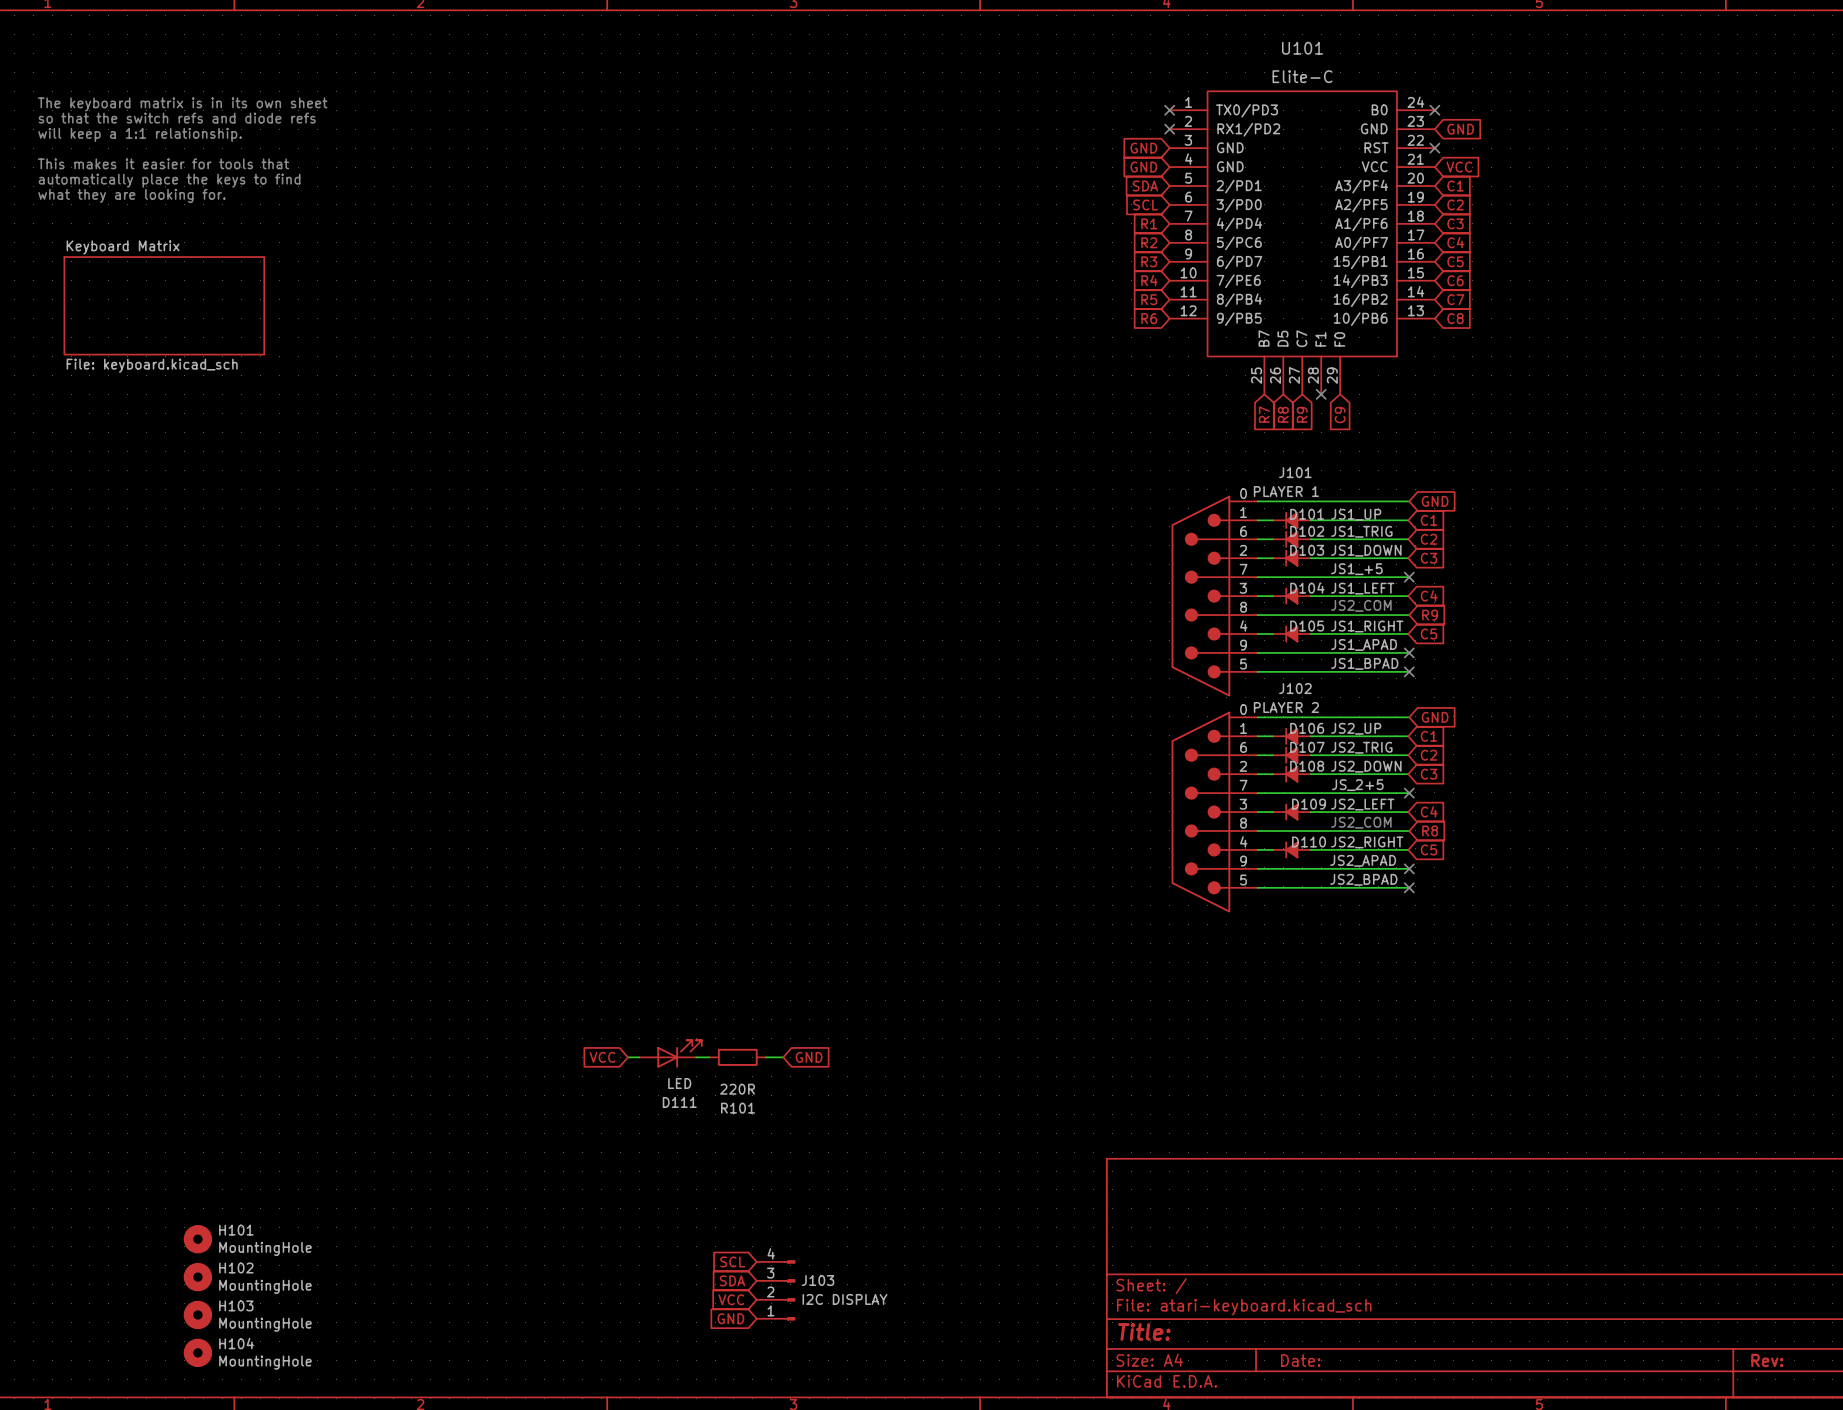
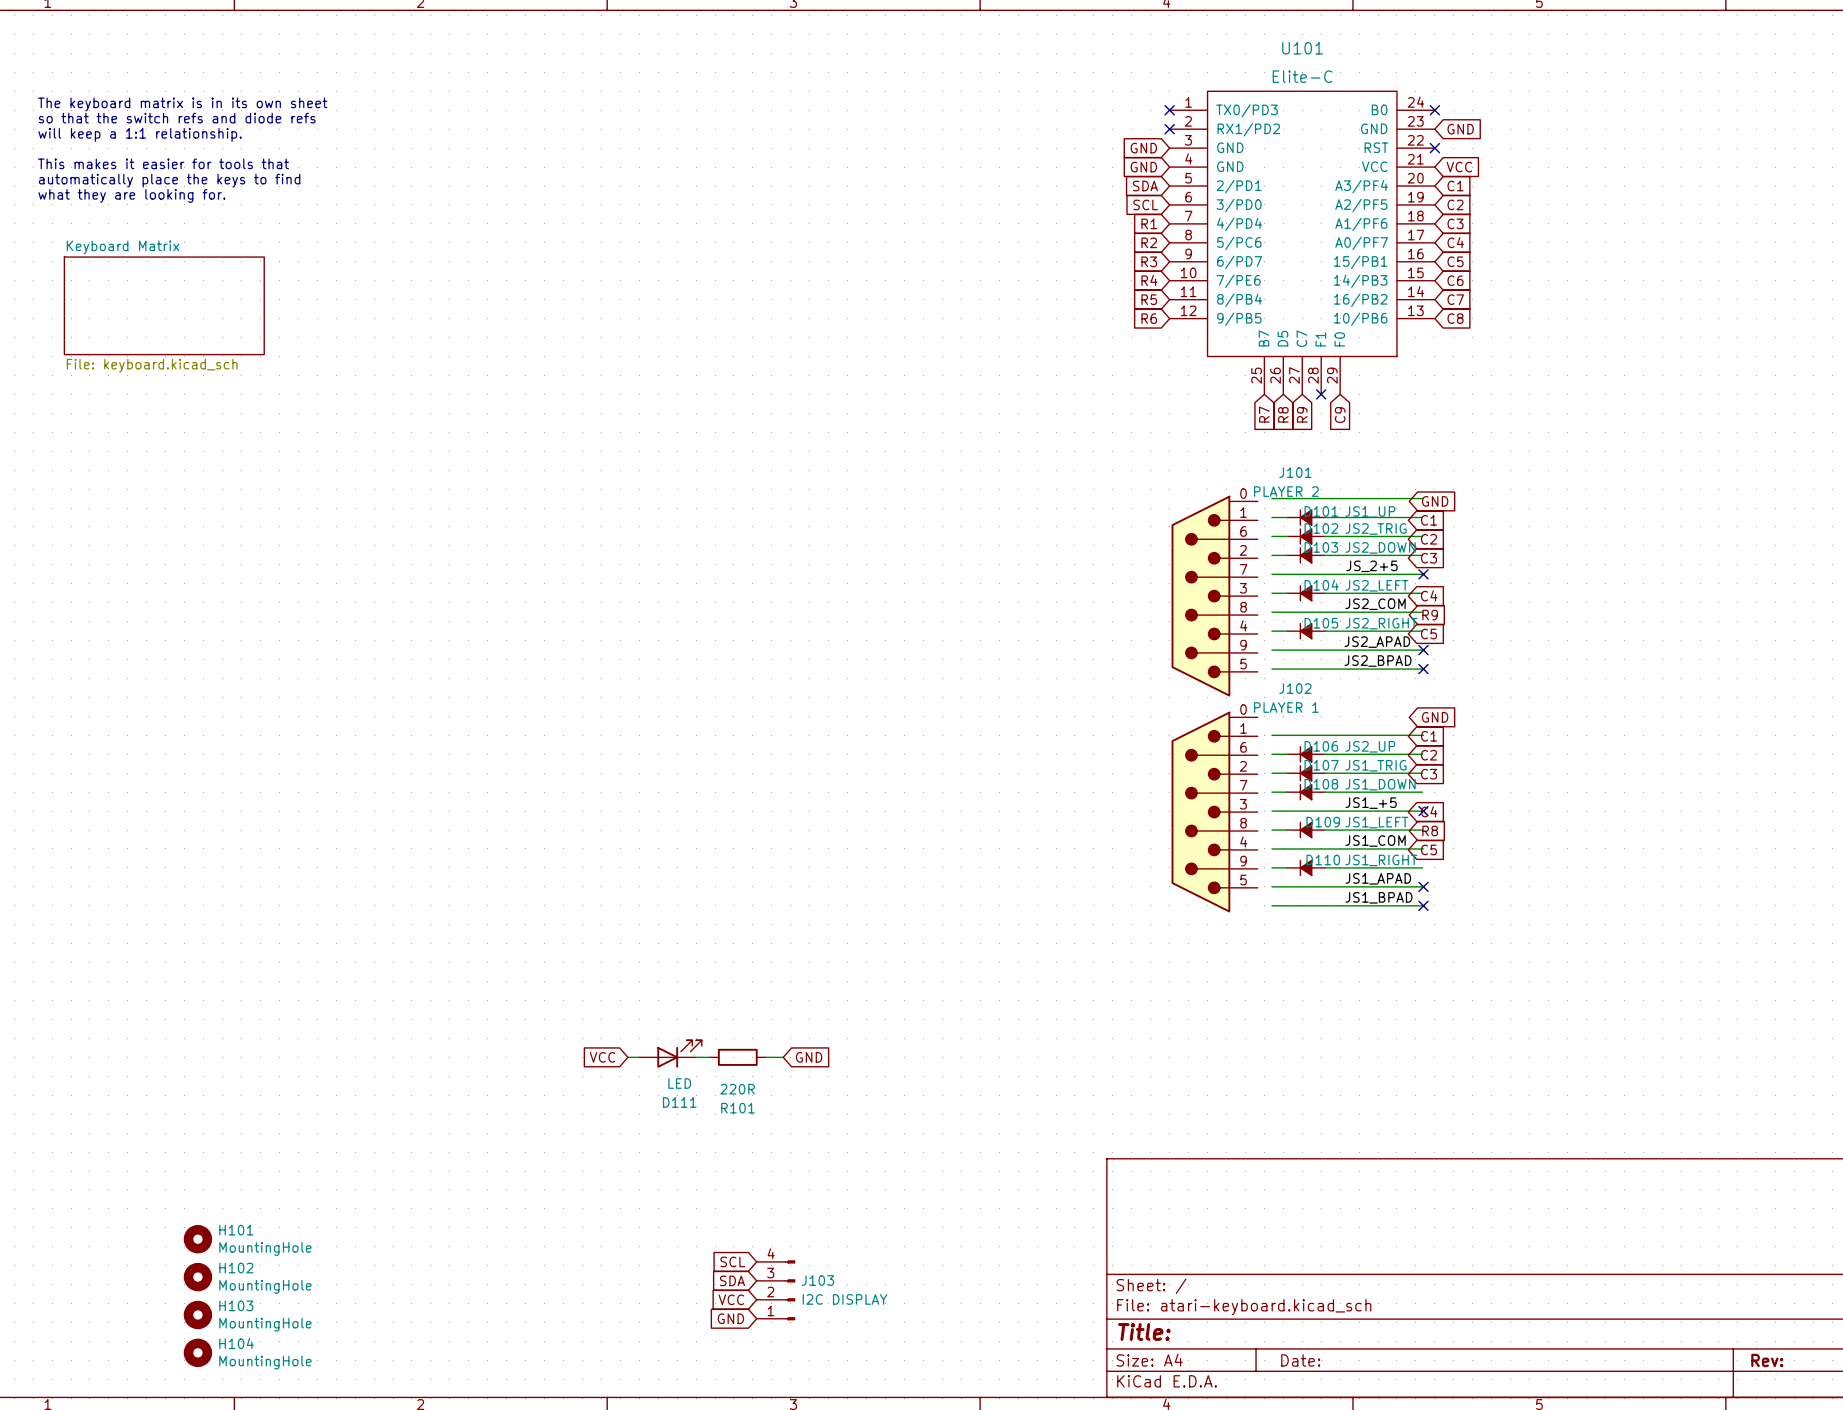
J101 value: PLAYER 1 (1286, 491) -> PLAYER 2 (1286, 491)
wire: (1257, 501) (1409, 501) -> (1271, 498) (1423, 498)
wire: (1257, 520) (1272, 520) -> (1271, 517) (1287, 517)
D101 position: (1291, 520) -> (1306, 517)
wire: (1310, 520) (1408, 520) -> (1324, 517) (1422, 517)
D102 value: JS1_TRIG (1361, 531) -> JS2_TRIG (1376, 528)
wire: (1257, 539) (1272, 539) -> (1271, 536) (1287, 536)
D102 position: (1291, 539) -> (1306, 536)
wire: (1310, 539) (1408, 539) -> (1324, 536) (1422, 536)
D103 value: JS1_DOWN (1366, 550) -> JS2_DOWN (1380, 547)
wire: (1257, 558) (1272, 558) -> (1271, 555) (1287, 555)
D103 position: (1291, 558) -> (1306, 555)
wire: (1310, 558) (1408, 558) -> (1324, 555) (1422, 555)
label: JS1_+5 (1356, 569) -> JS_2+5 (1372, 566)
wire: (1257, 577) (1409, 577) -> (1271, 574) (1423, 574)
no-connect mark position: (1409, 577) -> (1423, 574)
D104 value: JS1_LEFT (1362, 588) -> JS2_LEFT (1376, 585)
wire: (1257, 596) (1272, 596) -> (1271, 593) (1287, 593)
D104 position: (1291, 596) -> (1306, 593)
wire: (1310, 596) (1408, 596) -> (1324, 593) (1422, 593)
label: none -> JS2_COM (1375, 604)
text: JS2_COM (1361, 605) -> none
wire: (1257, 615) (1409, 615) -> (1271, 612) (1423, 612)
D105 value: JS1_RIGHT (1367, 626) -> JS2_RIGHT (1381, 623)
wire: (1257, 634) (1272, 634) -> (1271, 631) (1287, 631)
D105 position: (1291, 634) -> (1306, 631)
wire: (1310, 634) (1408, 634) -> (1324, 631) (1422, 631)
label: none -> JS2_APAD (1377, 642)
label: JS1_APAD (1364, 644) -> none
no-connect mark: none -> (1423, 650)
wire: (1257, 652) (1409, 652) -> (1271, 650) (1423, 650)
no-connect mark: (1409, 652) -> none
label: none -> JS2_BPAD (1378, 661)
label: JS1_BPAD (1364, 663) -> none
no-connect mark: none -> (1423, 669)
wire: (1257, 671) (1409, 671) -> (1271, 669) (1423, 669)
no-connect mark: (1409, 671) -> none
J102 value: PLAYER 2 (1286, 707) -> PLAYER 1 (1286, 707)
wire: (1257, 717) (1409, 717) -> (1271, 735) (1423, 735)
wire: (1257, 736) (1272, 736) -> (1271, 754) (1287, 754)
D106 position: (1291, 736) -> (1306, 754)
wire: (1310, 736) (1408, 736) -> (1324, 754) (1422, 754)
D107 value: JS2_TRIG (1361, 747) -> JS1_TRIG (1376, 765)
wire: (1257, 755) (1272, 755) -> (1271, 773) (1287, 773)
D107 position: (1291, 755) -> (1306, 773)
wire: (1310, 755) (1408, 755) -> (1324, 773) (1422, 773)
D108 value: JS2_DOWN (1366, 766) -> JS1_DOWN (1380, 784)
wire: (1257, 774) (1272, 774) -> (1271, 792) (1287, 792)
D108 position: (1291, 774) -> (1306, 792)
wire: (1310, 774) (1408, 774) -> (1324, 792) (1422, 792)
label: JS_2+5 (1357, 785) -> JS1_+5 (1371, 803)
wire: (1257, 793) (1409, 793) -> (1271, 811) (1423, 811)
no-connect mark position: (1409, 793) -> (1423, 811)
D109 value: JS2_LEFT (1362, 804) -> JS1_LEFT (1376, 822)
wire: (1257, 812) (1272, 812) -> (1271, 830) (1287, 830)
D109 position: (1291, 812) -> (1306, 830)
wire: (1310, 812) (1408, 812) -> (1324, 830) (1422, 830)
text: JS2_COM (1361, 822) -> none
wire: (1257, 831) (1409, 831) -> (1271, 848) (1423, 848)
label: none -> JS1_COM (1375, 840)
D110 value: JS2_RIGHT (1367, 842) -> JS1_RIGHT (1381, 860)
wire: (1257, 849) (1272, 849) -> (1271, 867) (1287, 867)
D110 position: (1291, 849) -> (1306, 867)
wire: (1310, 849) (1408, 849) -> (1324, 867) (1422, 867)
label: JS2_APAD (1363, 860) -> none
wire: (1257, 868) (1409, 868) -> (1271, 886) (1423, 886)
no-connect mark: (1409, 868) -> none
label: none -> JS1_APAD (1378, 878)
label: JS2_BPAD (1363, 879) -> none
no-connect mark: none -> (1423, 886)
wire: (1257, 887) (1409, 887) -> (1271, 905) (1423, 905)
no-connect mark: (1409, 887) -> none
label: none -> JS1_BPAD (1378, 897)
no-connect mark: none -> (1423, 905)

